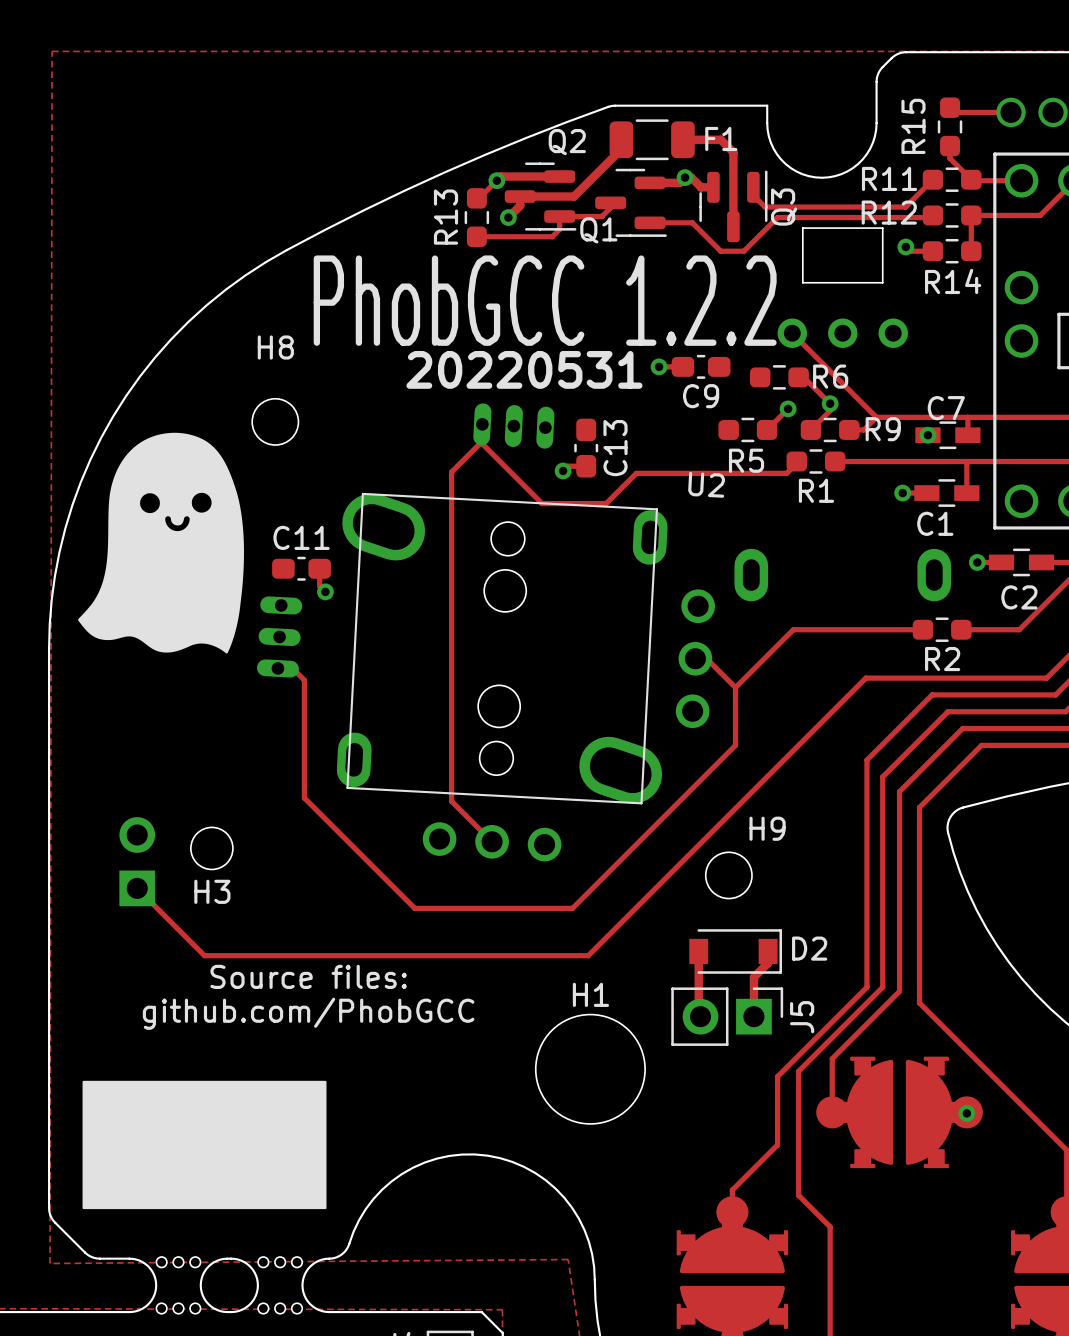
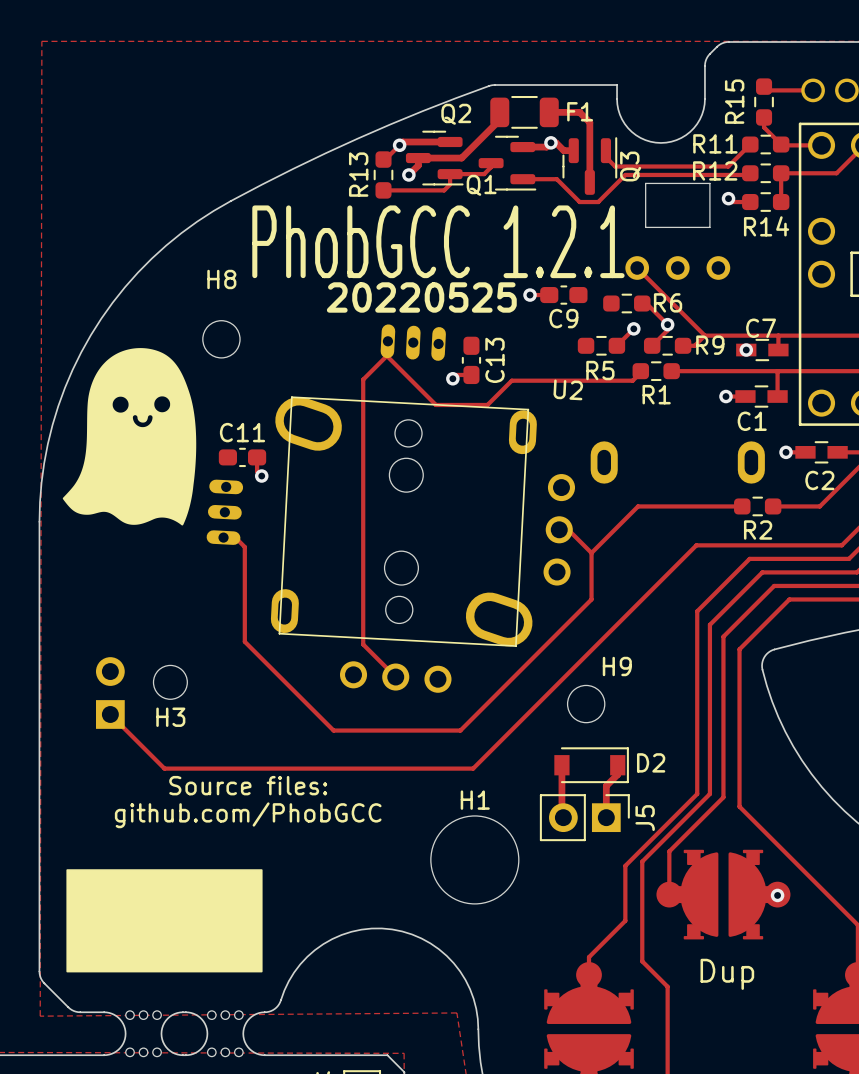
text: PhobGCC 1.2.2 (545, 300) -> PhobGCC 1.2.1 (438, 241)
text: 20220531 (524, 369) -> 20220525 (421, 297)
part value: none -> Dup (727, 974)

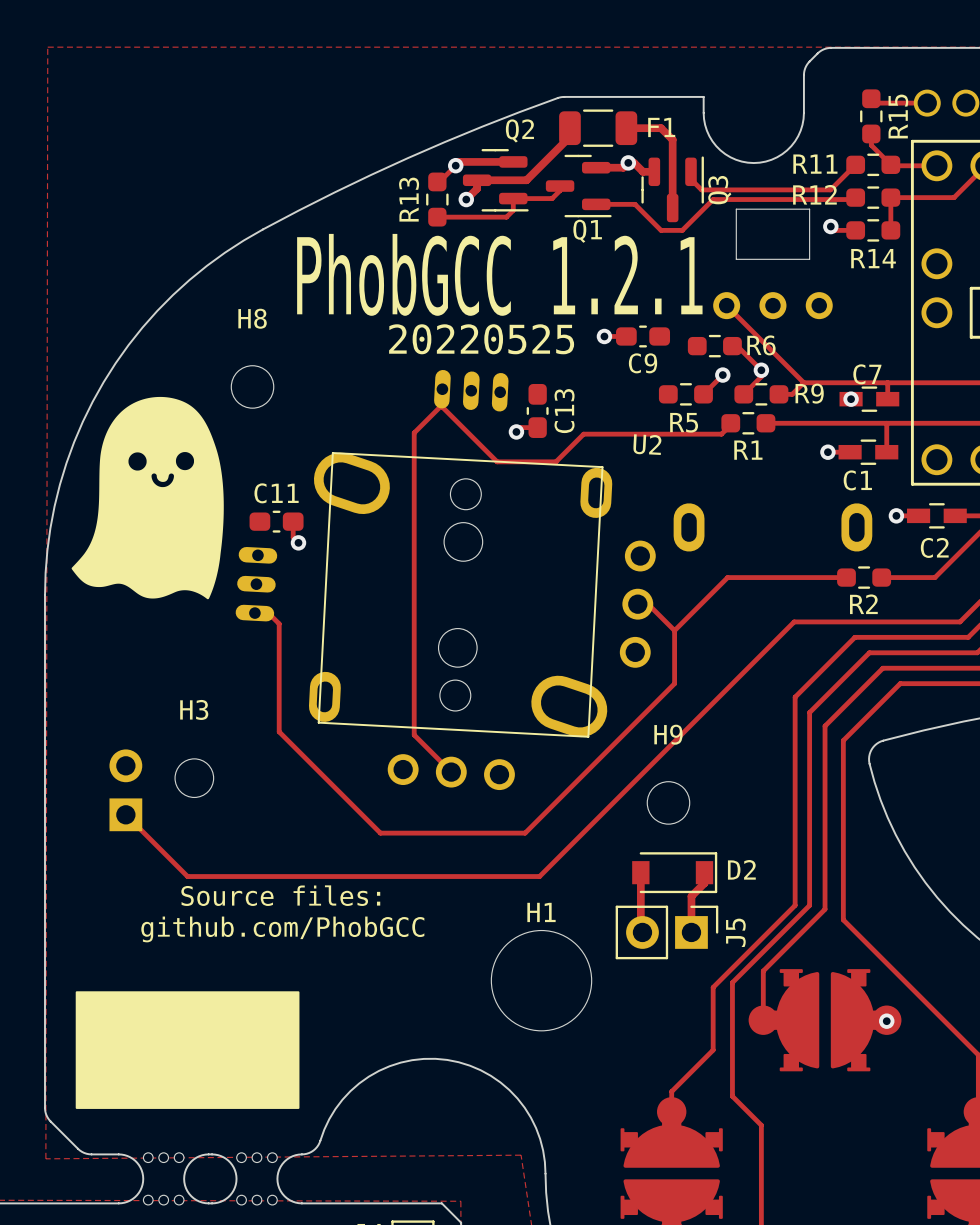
R15 name position: R15 (734, 101) -> R15 (898, 116)
Q1 name position: Q1 (481, 185) -> Q1 (587, 231)
H9 name position: H9 (617, 666) -> H9 (668, 734)
H3 name position: H3 (170, 717) -> H3 (194, 709)
part value: Dup (727, 974) -> none

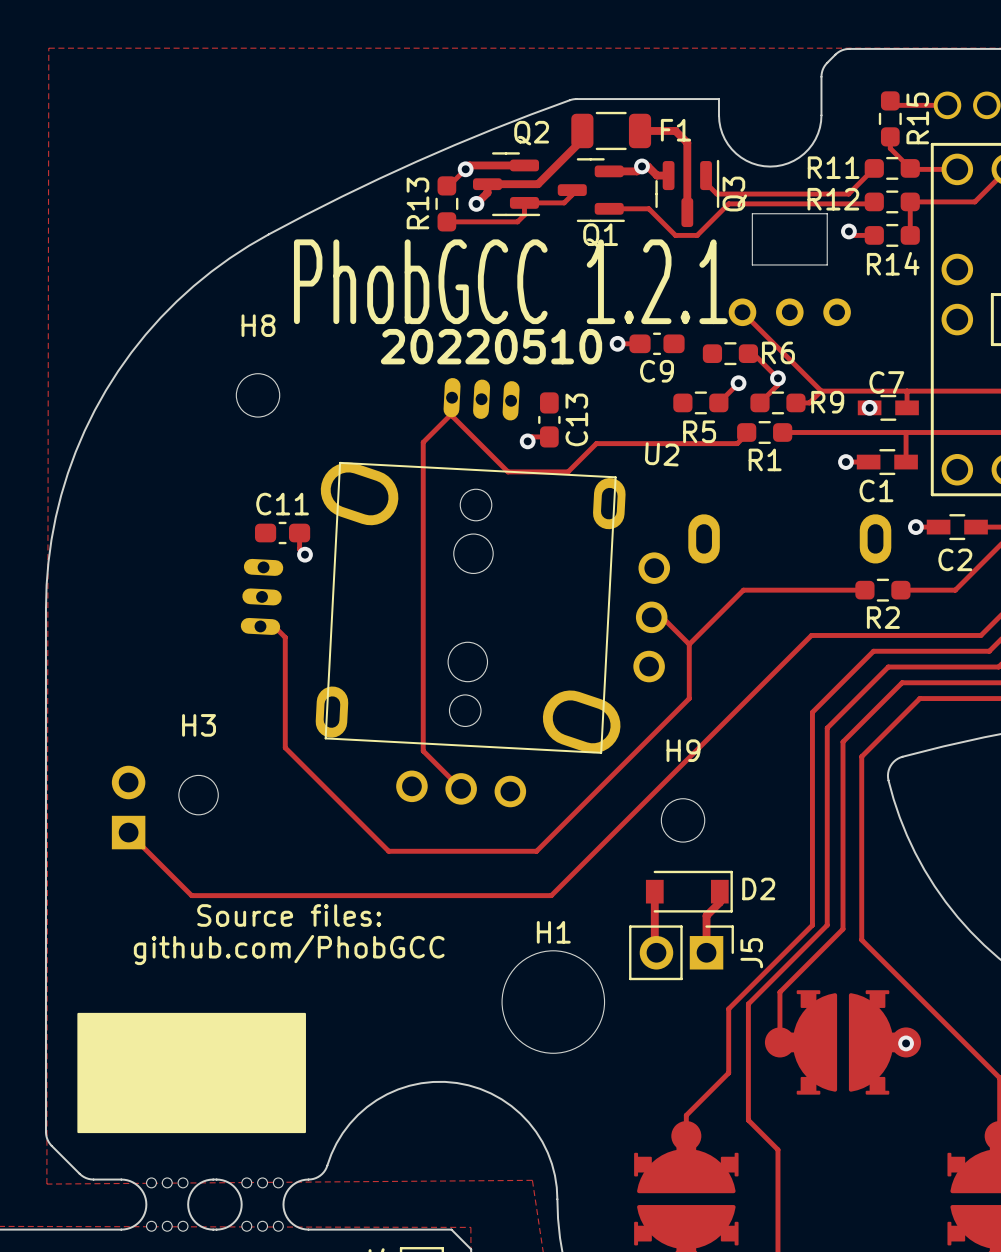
text: 20220525 (481, 339) -> 20220510 (491, 346)
drawing: [71, 396, 224, 600] -> none

